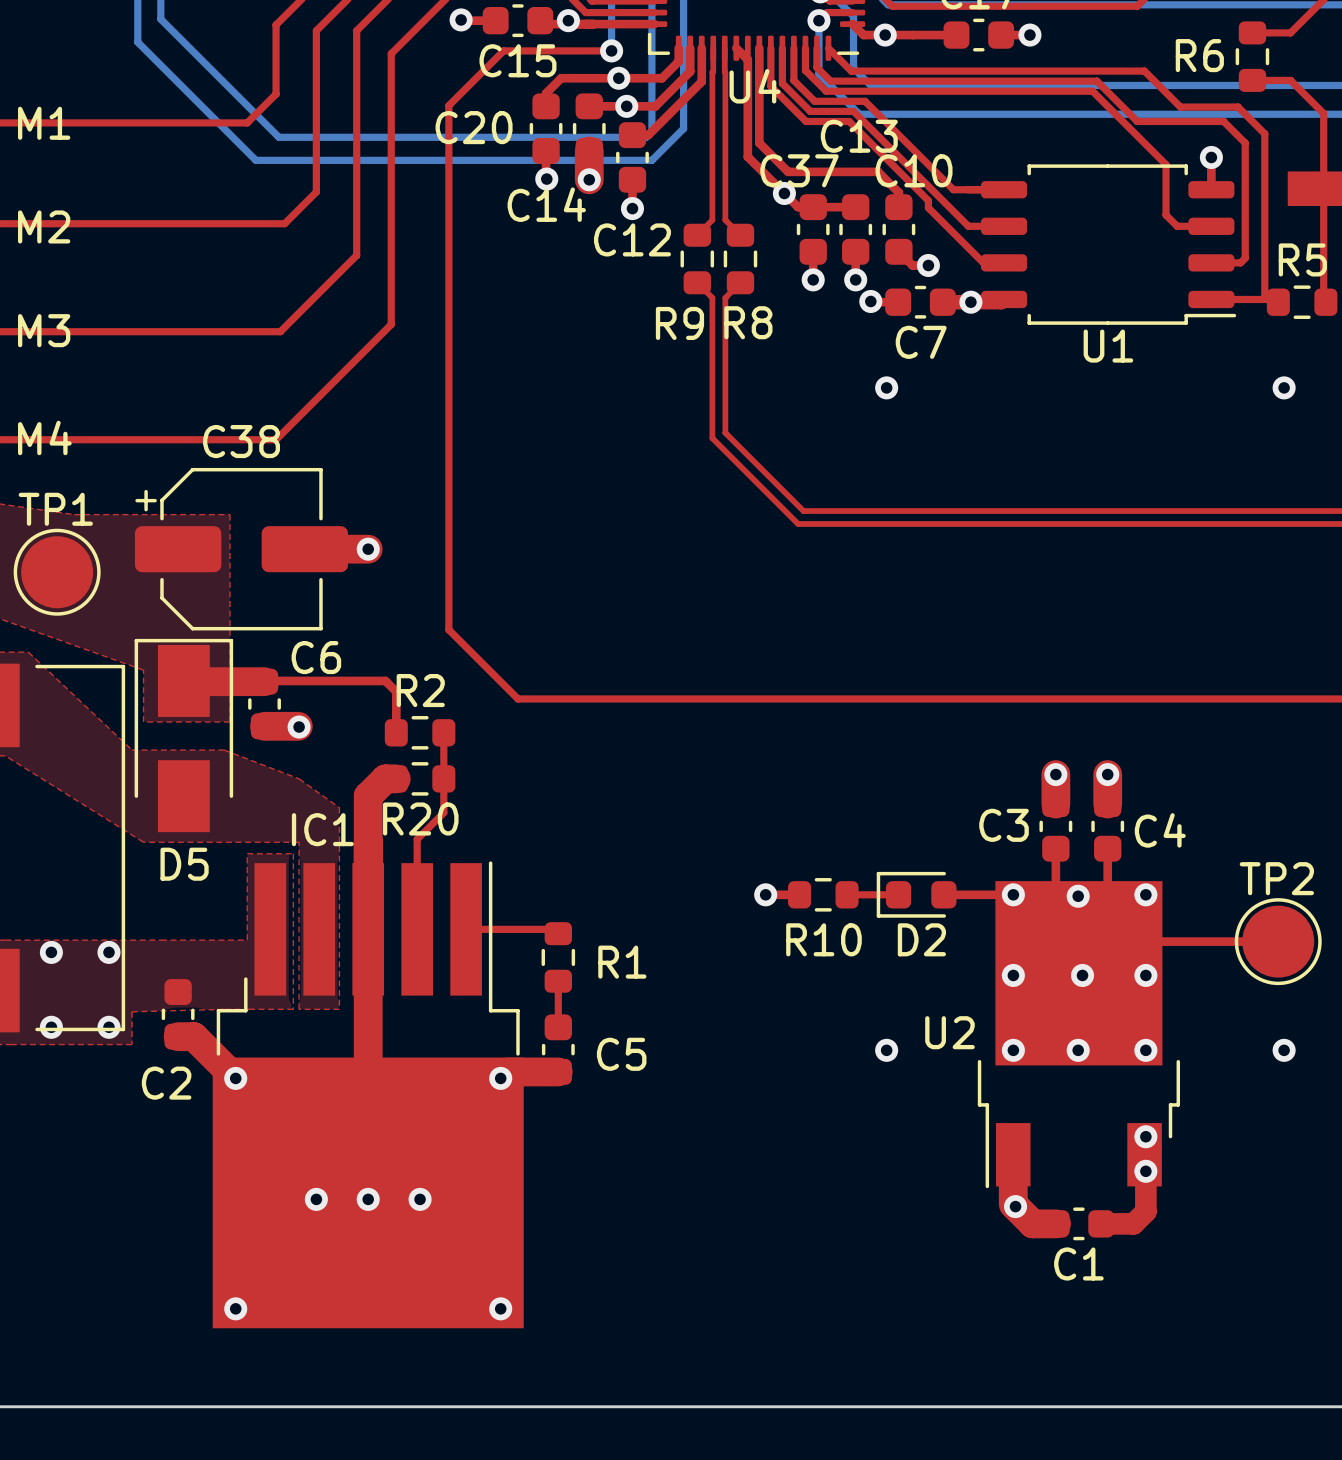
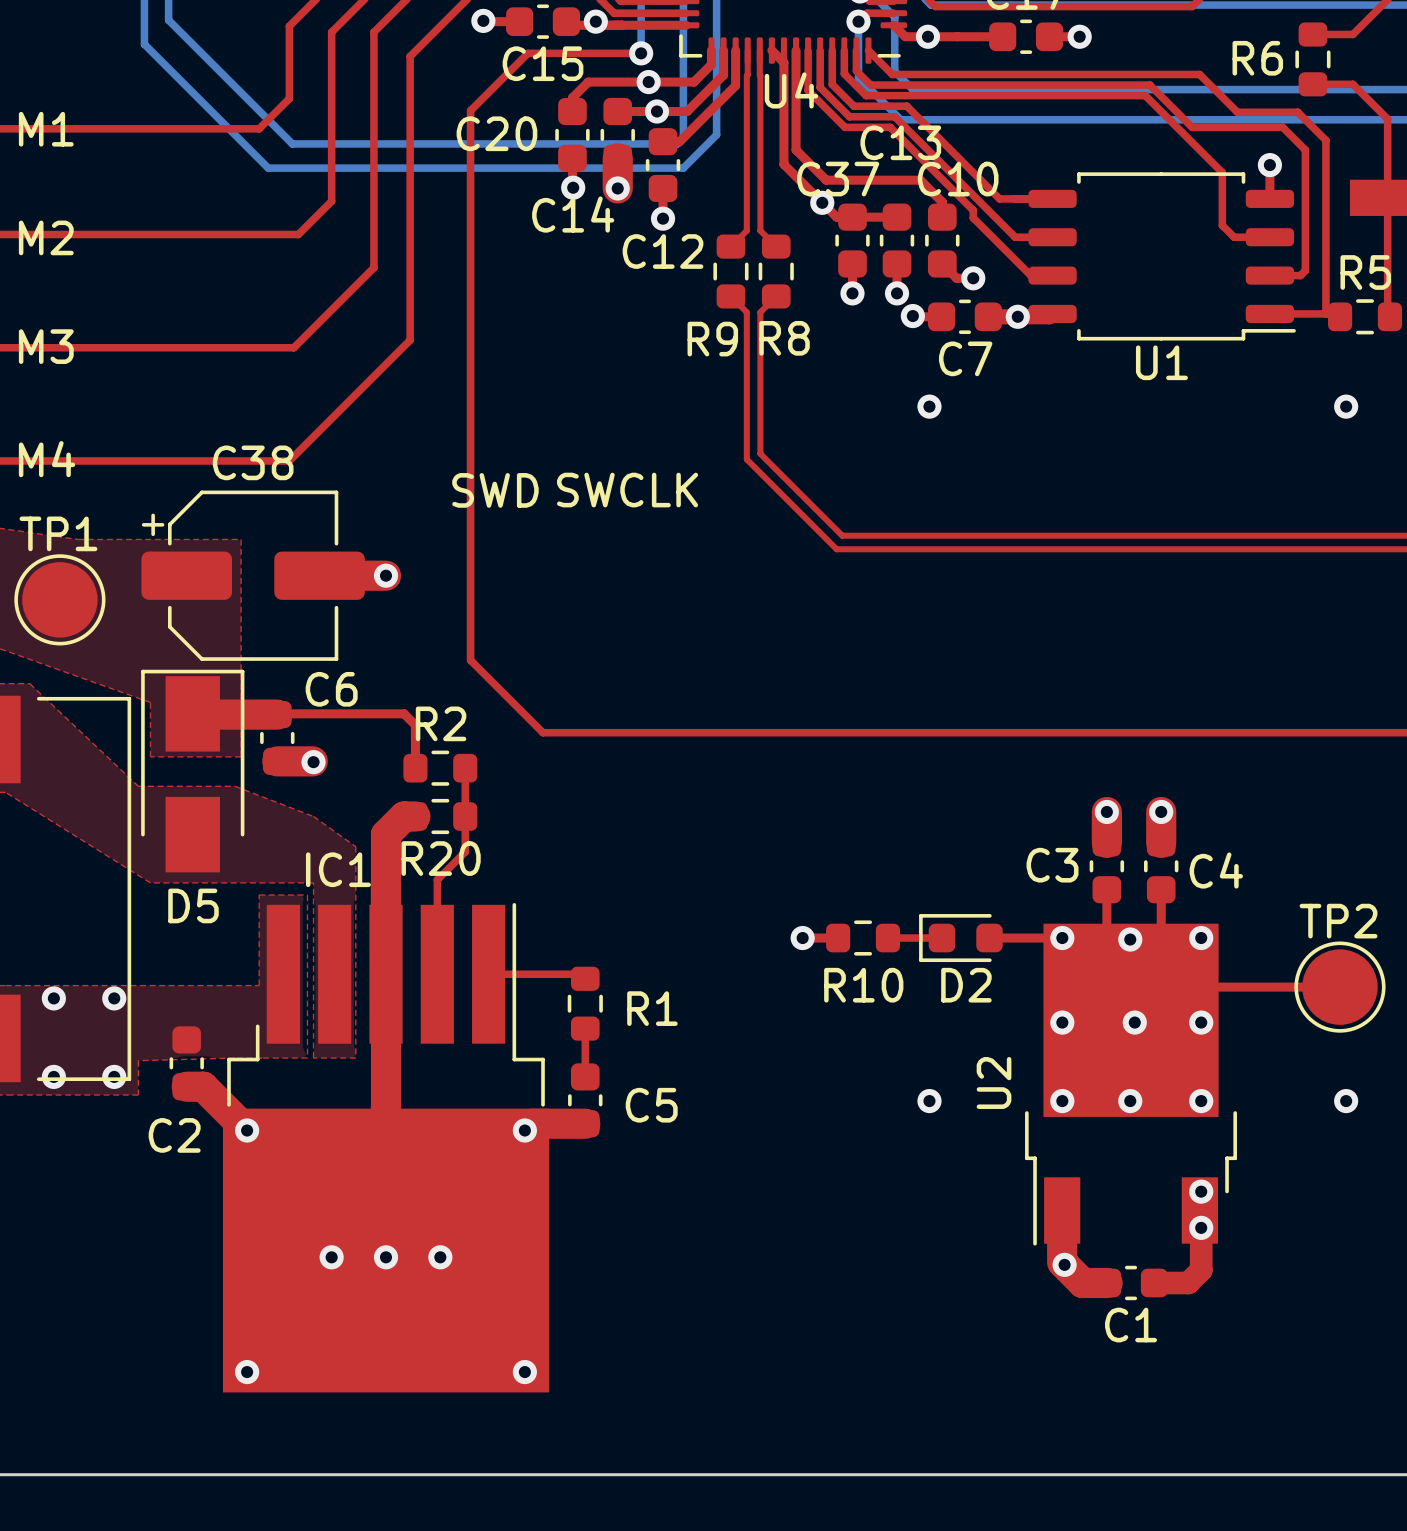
text: none -> SWD (495, 490)
text: none -> SWCLK (627, 490)
U2 name rotation: 0° (949, 1032) -> 90° counterclockwise (994, 1082)

